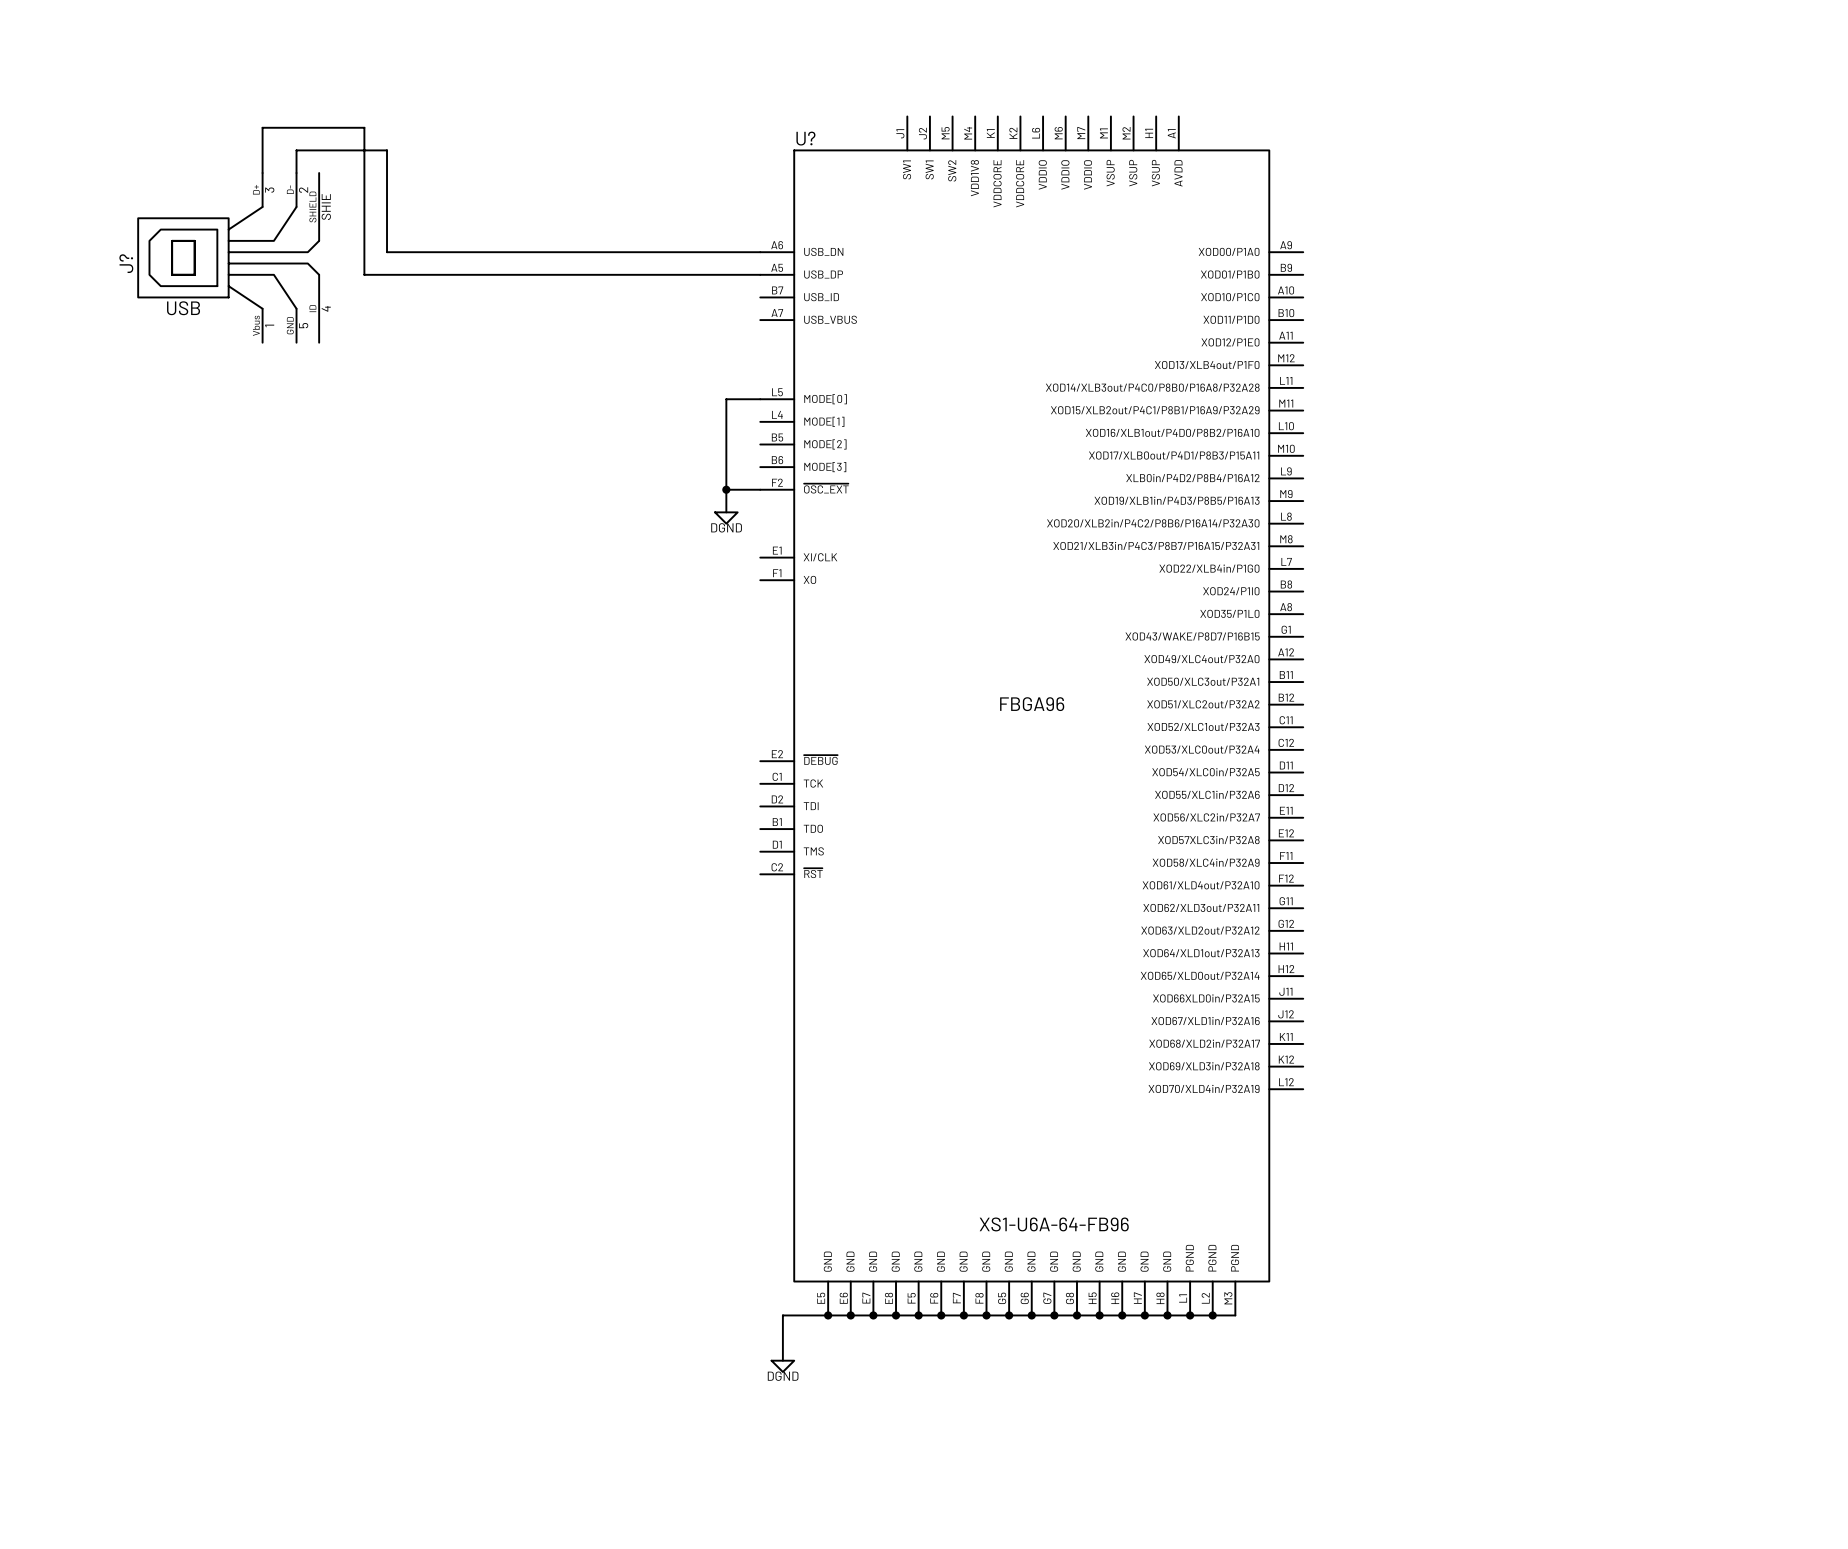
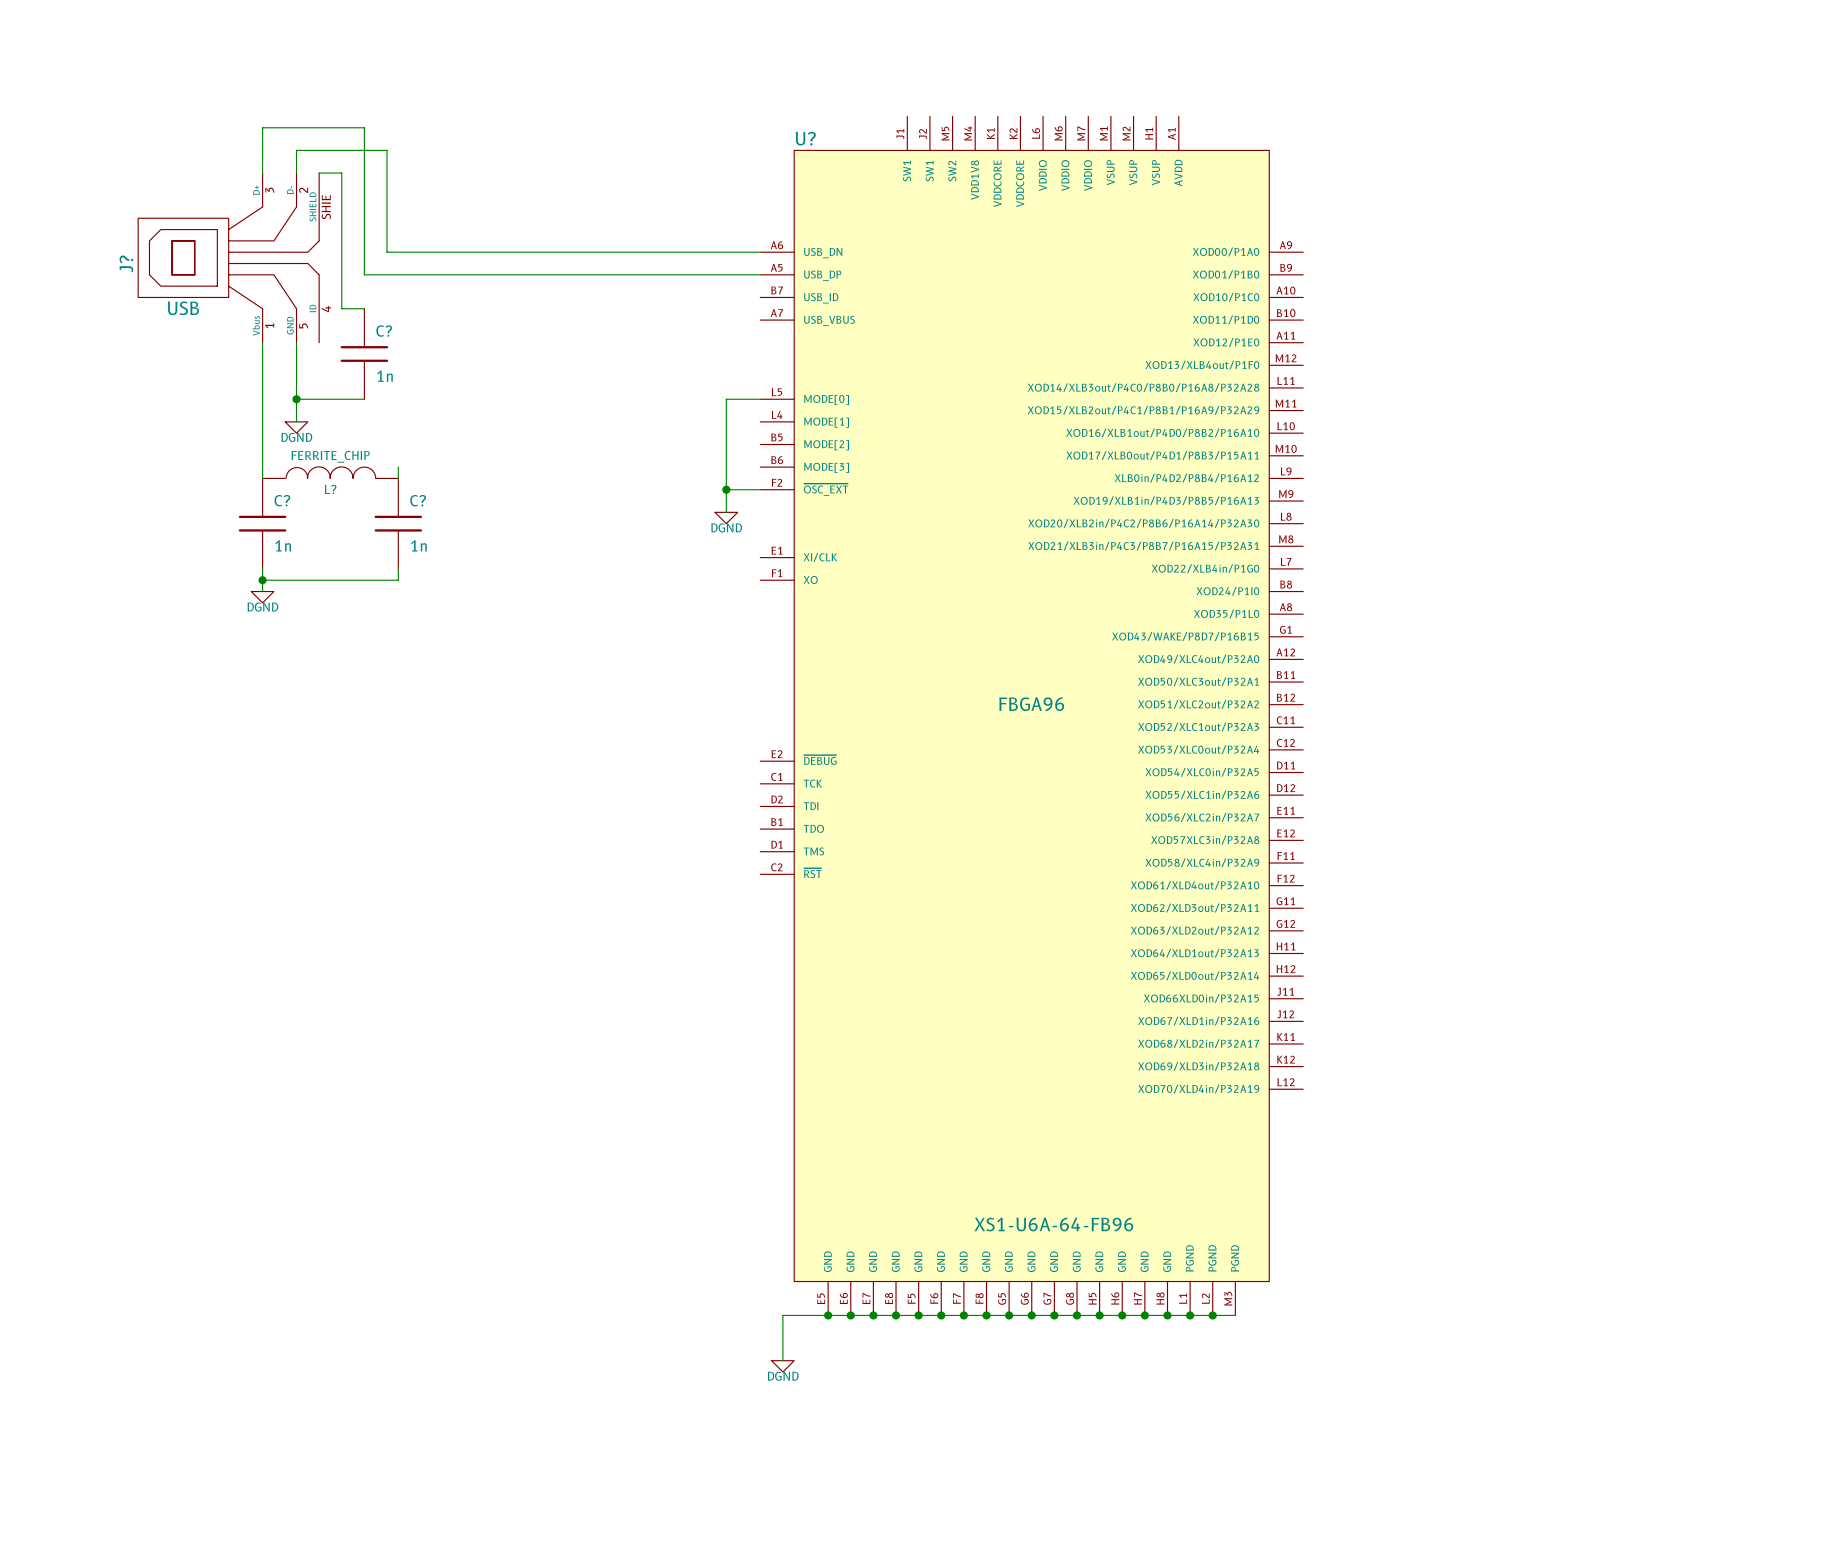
wire: none -> (319, 173) (341, 173) (341, 308) (364, 308)
wire: none -> (262, 342) (262, 478)
wire: none -> (296, 342) (296, 421)
C?: none -> 1n (364, 354)
wire: none -> (296, 399) (364, 399)
junction: none -> (296, 399)
power symbol: none -> DGND (296, 427)
wire: none -> (398, 467) (398, 478)
L?: none -> FERRITE_CHIP (330, 472)
C?: none -> 1n (262, 523)
C?: none -> 1n (398, 523)
wire: none -> (262, 568) (262, 591)
wire: none -> (398, 568) (398, 580) (262, 580)
junction: none -> (262, 580)
power symbol: none -> DGND (262, 597)

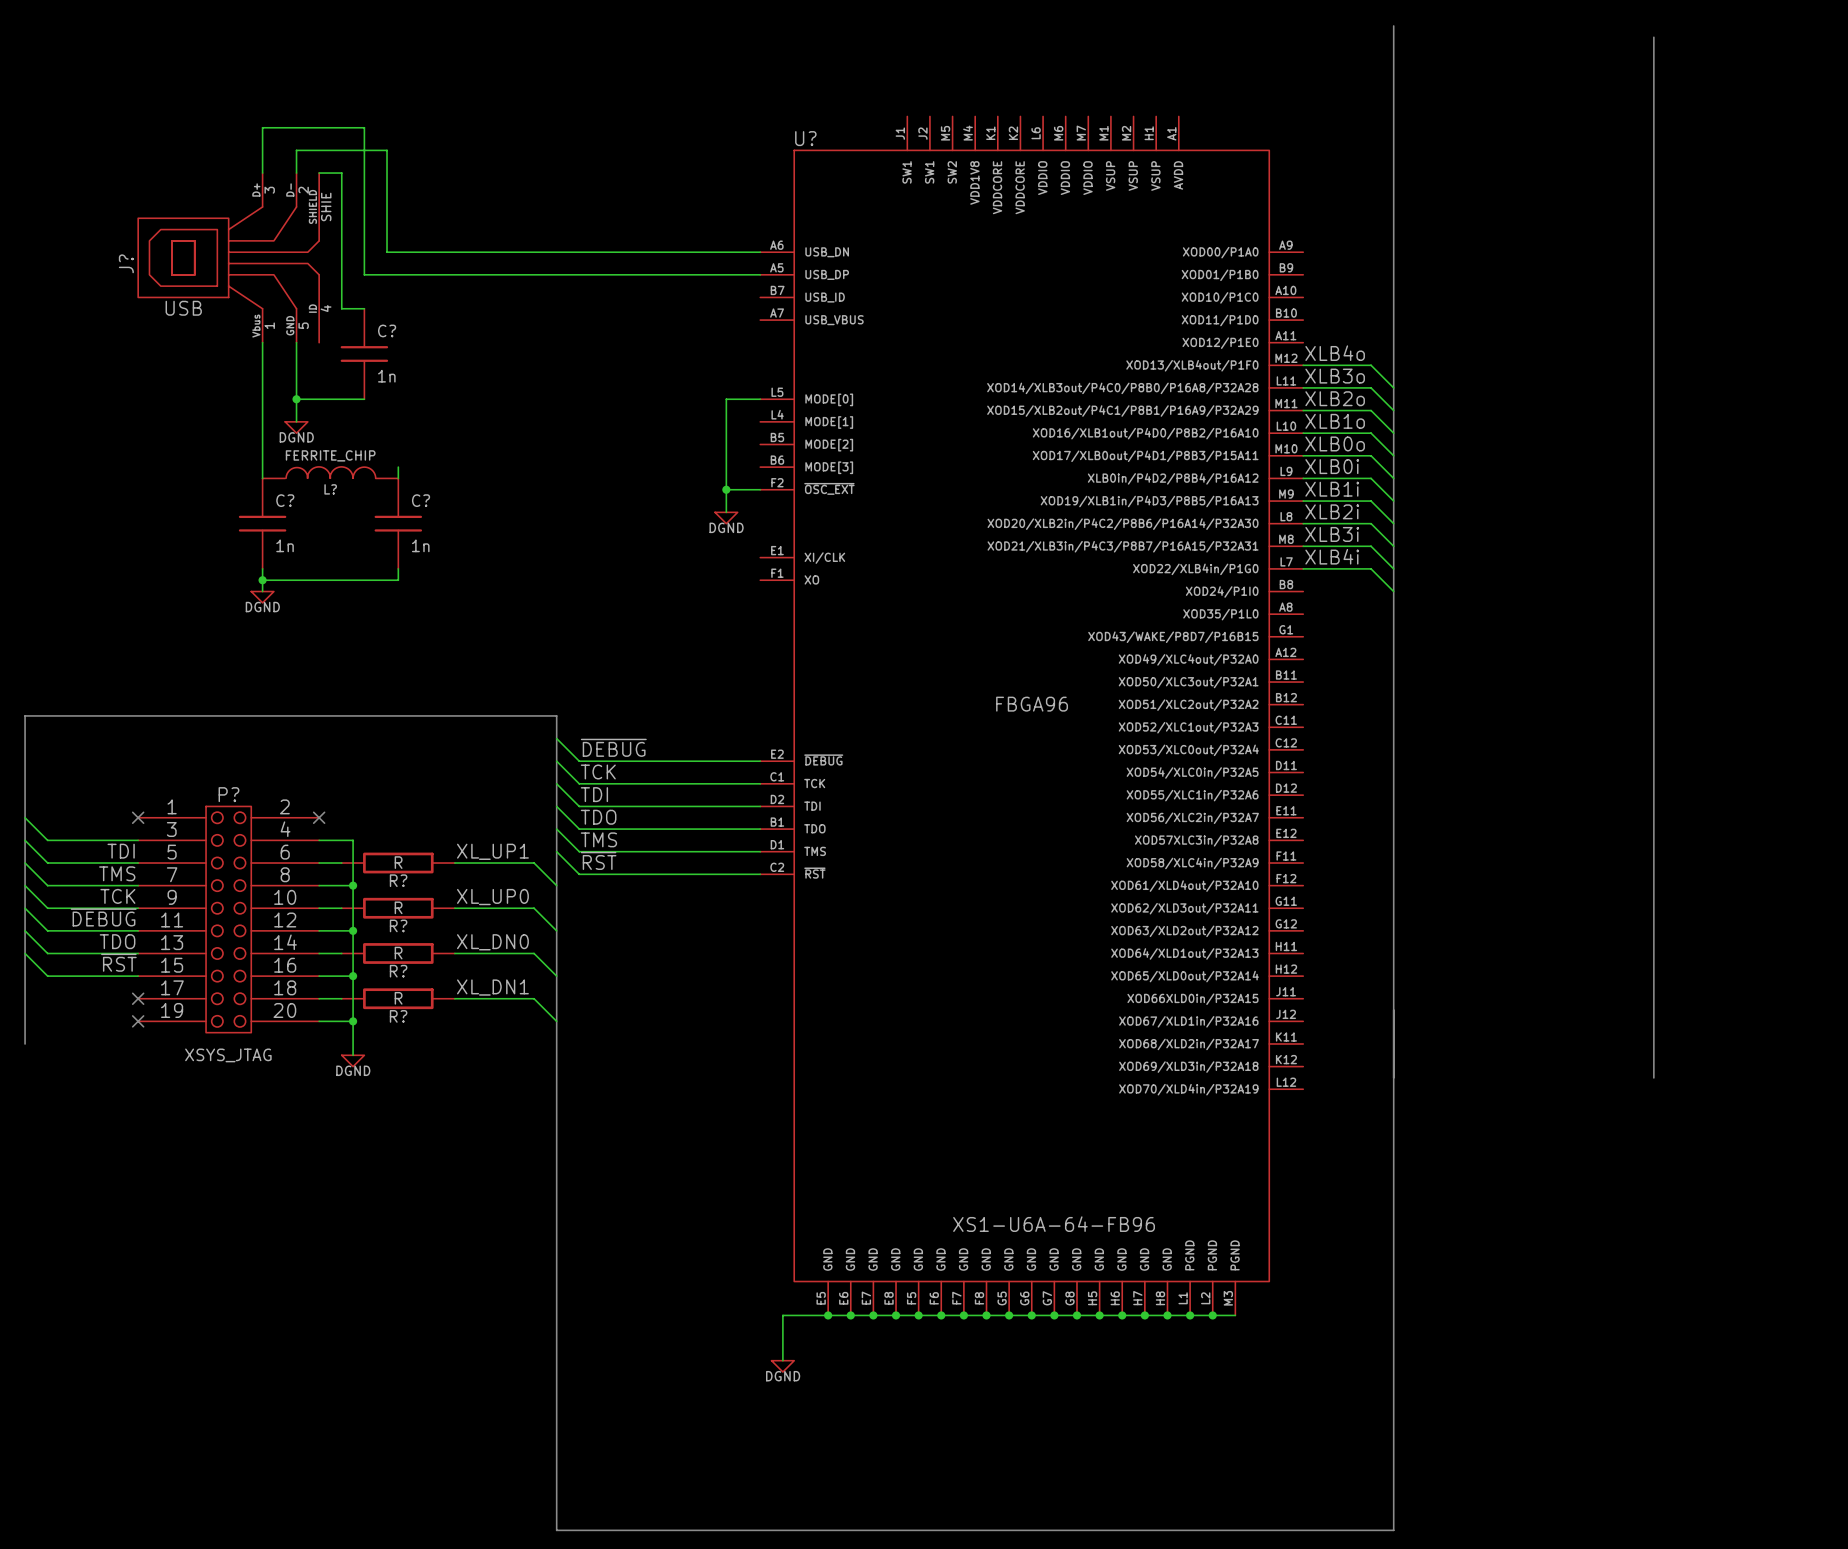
bus: none -> (1393, 25) (1393, 1530) (556, 1530) (556, 715) (25, 715) (25, 1043)
bus: none -> (1653, 37) (1653, 1077)
label: none -> XLB4o (1335, 353)
wire: none -> (1303, 365) (1371, 365) (1393, 387)
label: none -> XLB3o (1335, 376)
wire: none -> (1303, 387) (1371, 387) (1393, 410)
label: none -> XLB2o (1335, 398)
wire: none -> (1303, 410) (1371, 410) (1393, 433)
label: none -> XLB1o (1335, 421)
wire: none -> (1303, 433) (1371, 433) (1393, 455)
label: none -> XLB0o (1335, 443)
wire: none -> (1303, 455) (1371, 455) (1393, 478)
label: none -> XLB0i (1332, 466)
wire: none -> (1303, 478) (1371, 478) (1393, 501)
label: none -> XLB1i (1332, 489)
wire: none -> (1303, 501) (1371, 501) (1393, 523)
label: none -> XLB2i (1332, 511)
wire: none -> (1303, 523) (1371, 523) (1393, 546)
label: none -> XLB3i (1332, 534)
wire: none -> (1303, 546) (1371, 546) (1393, 568)
label: none -> XLB4i (1332, 556)
wire: none -> (1303, 568) (1371, 568) (1393, 591)
wire: none -> (556, 738) (579, 761) (760, 761)
label: none -> ~{DEBUG} (613, 747)
wire: none -> (556, 761) (579, 783) (760, 783)
label: none -> TCK (598, 771)
wire: none -> (556, 783) (579, 806) (760, 806)
label: none -> TDI (594, 794)
wire: none -> (556, 806) (579, 829) (760, 829)
wire: none -> (25, 817) (47, 840) (138, 840)
no-connect mark: none -> (138, 817)
no-connect mark: none -> (319, 817)
label: none -> TDO (598, 817)
wire: none -> (556, 829) (579, 851) (760, 851)
label: none -> TMS (598, 839)
wire: none -> (25, 840) (47, 863) (138, 863)
wire: none -> (319, 840) (353, 840) (353, 1055)
label: none -> TDI (121, 851)
wire: none -> (556, 851) (579, 874) (760, 874)
label: none -> XL_UP1 (492, 851)
label: none -> ~{RST} (598, 860)
wire: none -> (25, 863) (47, 885) (138, 885)
wire: none -> (319, 863) (341, 863)
R?: none -> R (398, 863)
wire: none -> (454, 863) (534, 863) (556, 885)
label: none -> TMS (117, 873)
wire: none -> (25, 885) (47, 908) (138, 908)
wire: none -> (319, 885) (353, 885)
junction: none -> (353, 885)
label: none -> TCK (117, 896)
label: none -> XL_UP0 (492, 897)
wire: none -> (25, 908) (47, 930) (138, 930)
wire: none -> (319, 908) (341, 908)
R?: none -> R (398, 908)
wire: none -> (454, 908) (534, 908) (556, 930)
label: none -> ~{DEBUG} (103, 917)
P?: none -> XSYS_JTAG (228, 919)
wire: none -> (25, 930) (47, 953) (138, 953)
wire: none -> (319, 930) (353, 930)
junction: none -> (353, 930)
label: none -> TDO (117, 941)
label: none -> XL_DN0 (492, 942)
wire: none -> (25, 953) (47, 976) (138, 976)
wire: none -> (319, 953) (341, 953)
R?: none -> R (398, 953)
wire: none -> (454, 953) (534, 953) (556, 976)
label: none -> ~{RST} (118, 962)
wire: none -> (319, 976) (353, 976)
junction: none -> (353, 976)
label: none -> XL_DN1 (492, 987)
no-connect mark: none -> (138, 998)
wire: none -> (319, 998) (341, 998)
R?: none -> R (398, 998)
wire: none -> (454, 998) (534, 998) (556, 1021)
no-connect mark: none -> (138, 1021)
wire: none -> (319, 1021) (353, 1021)
junction: none -> (353, 1021)
power symbol: none -> DGND (353, 1060)

